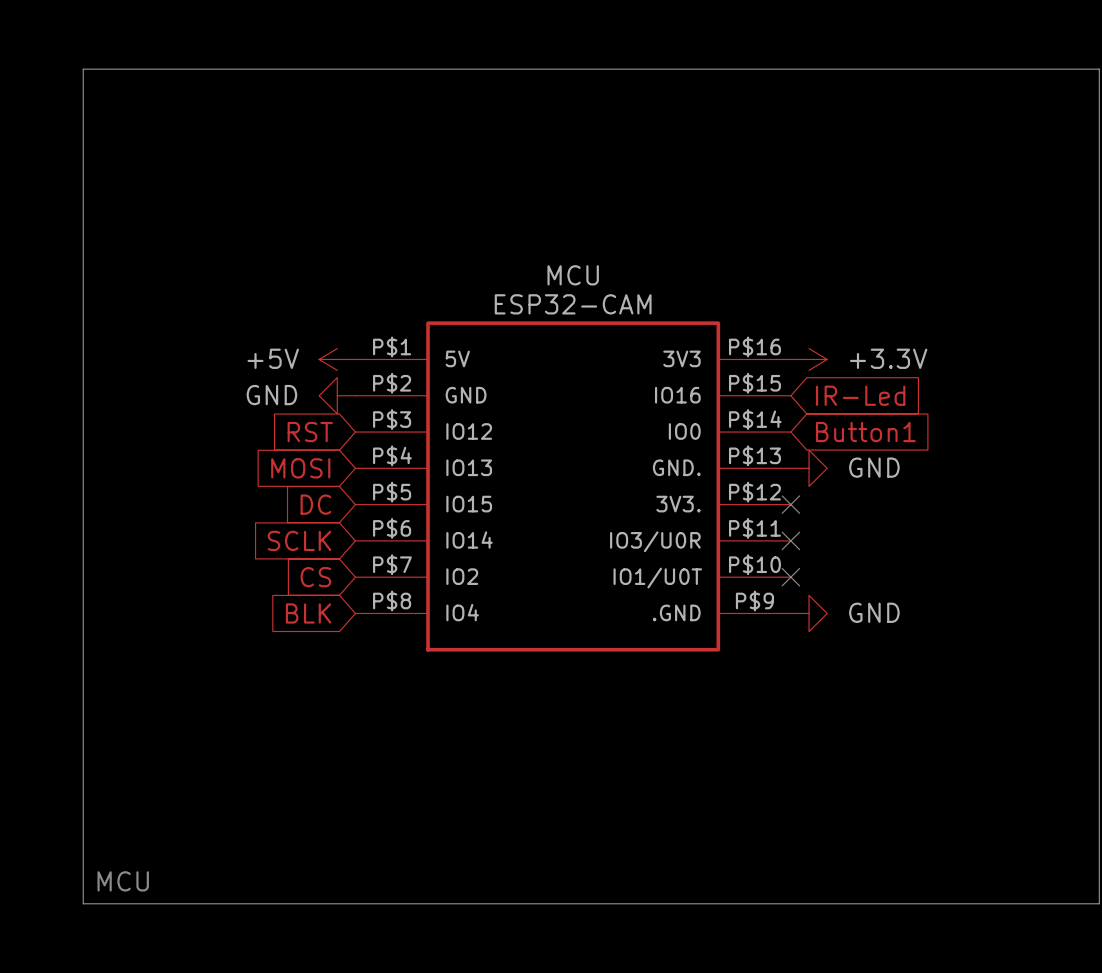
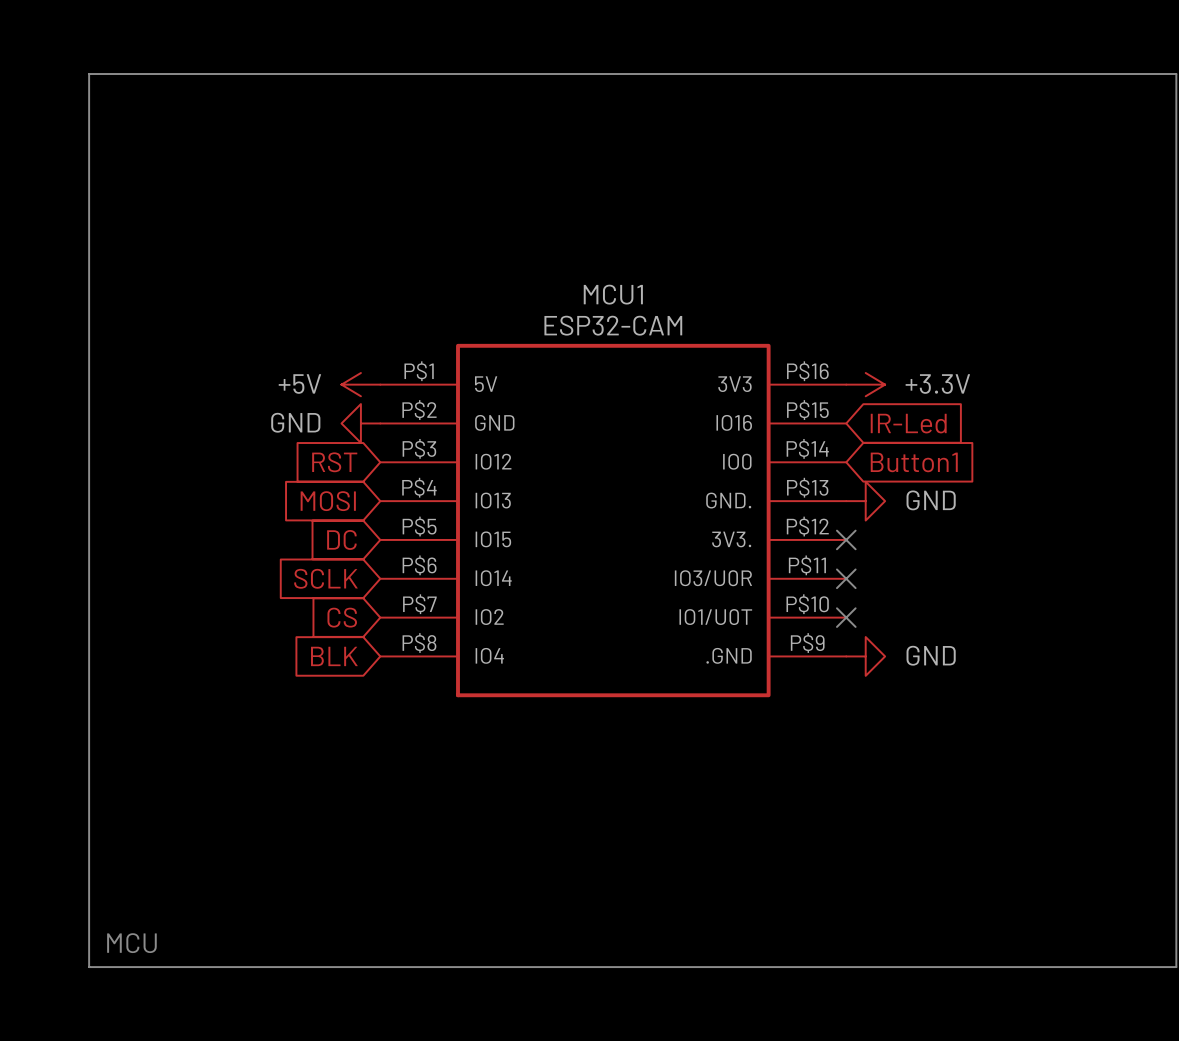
MCU name: MCU (573, 275) -> MCU1 (613, 294)

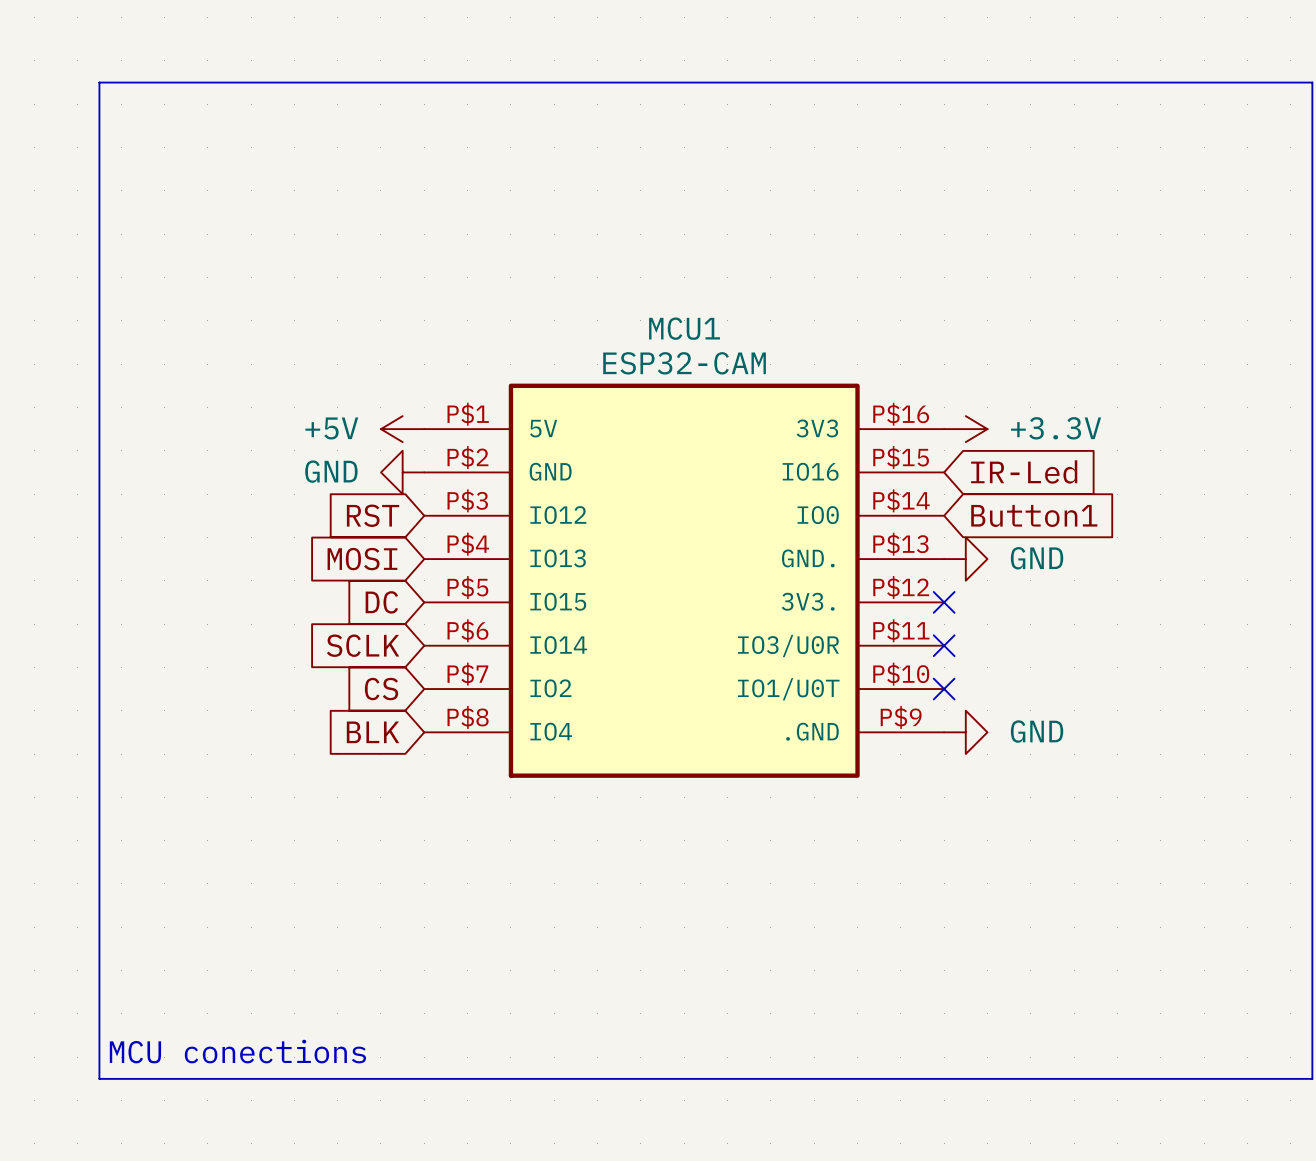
text: MCU (131, 943) -> none
text: none -> MCU conections (237, 1051)

